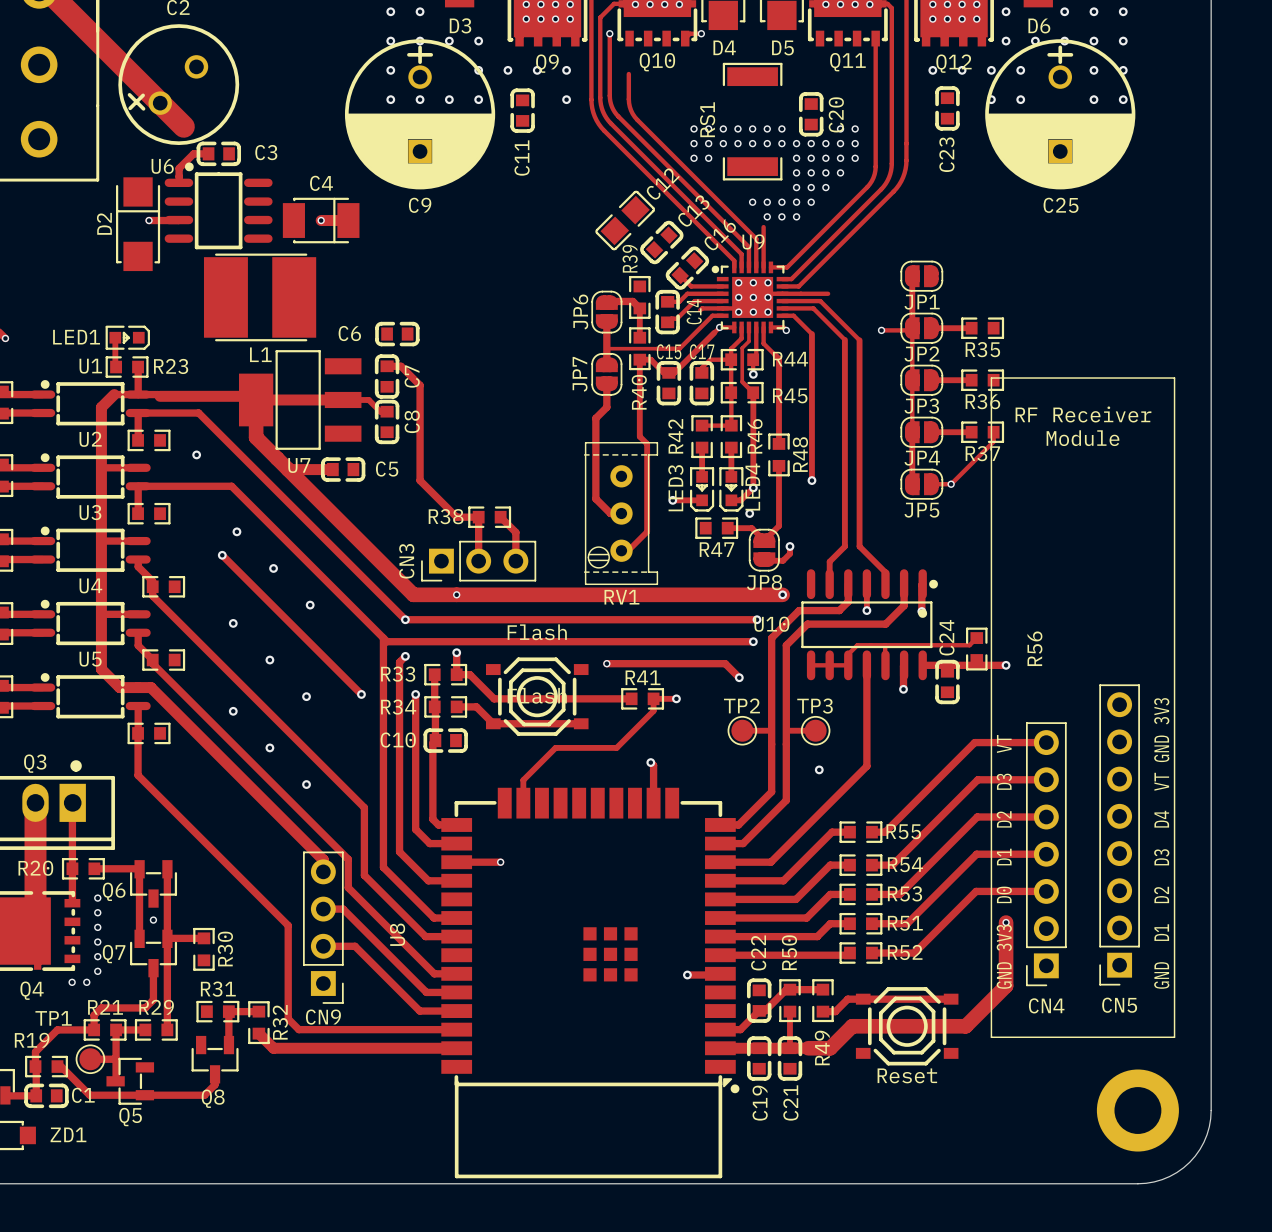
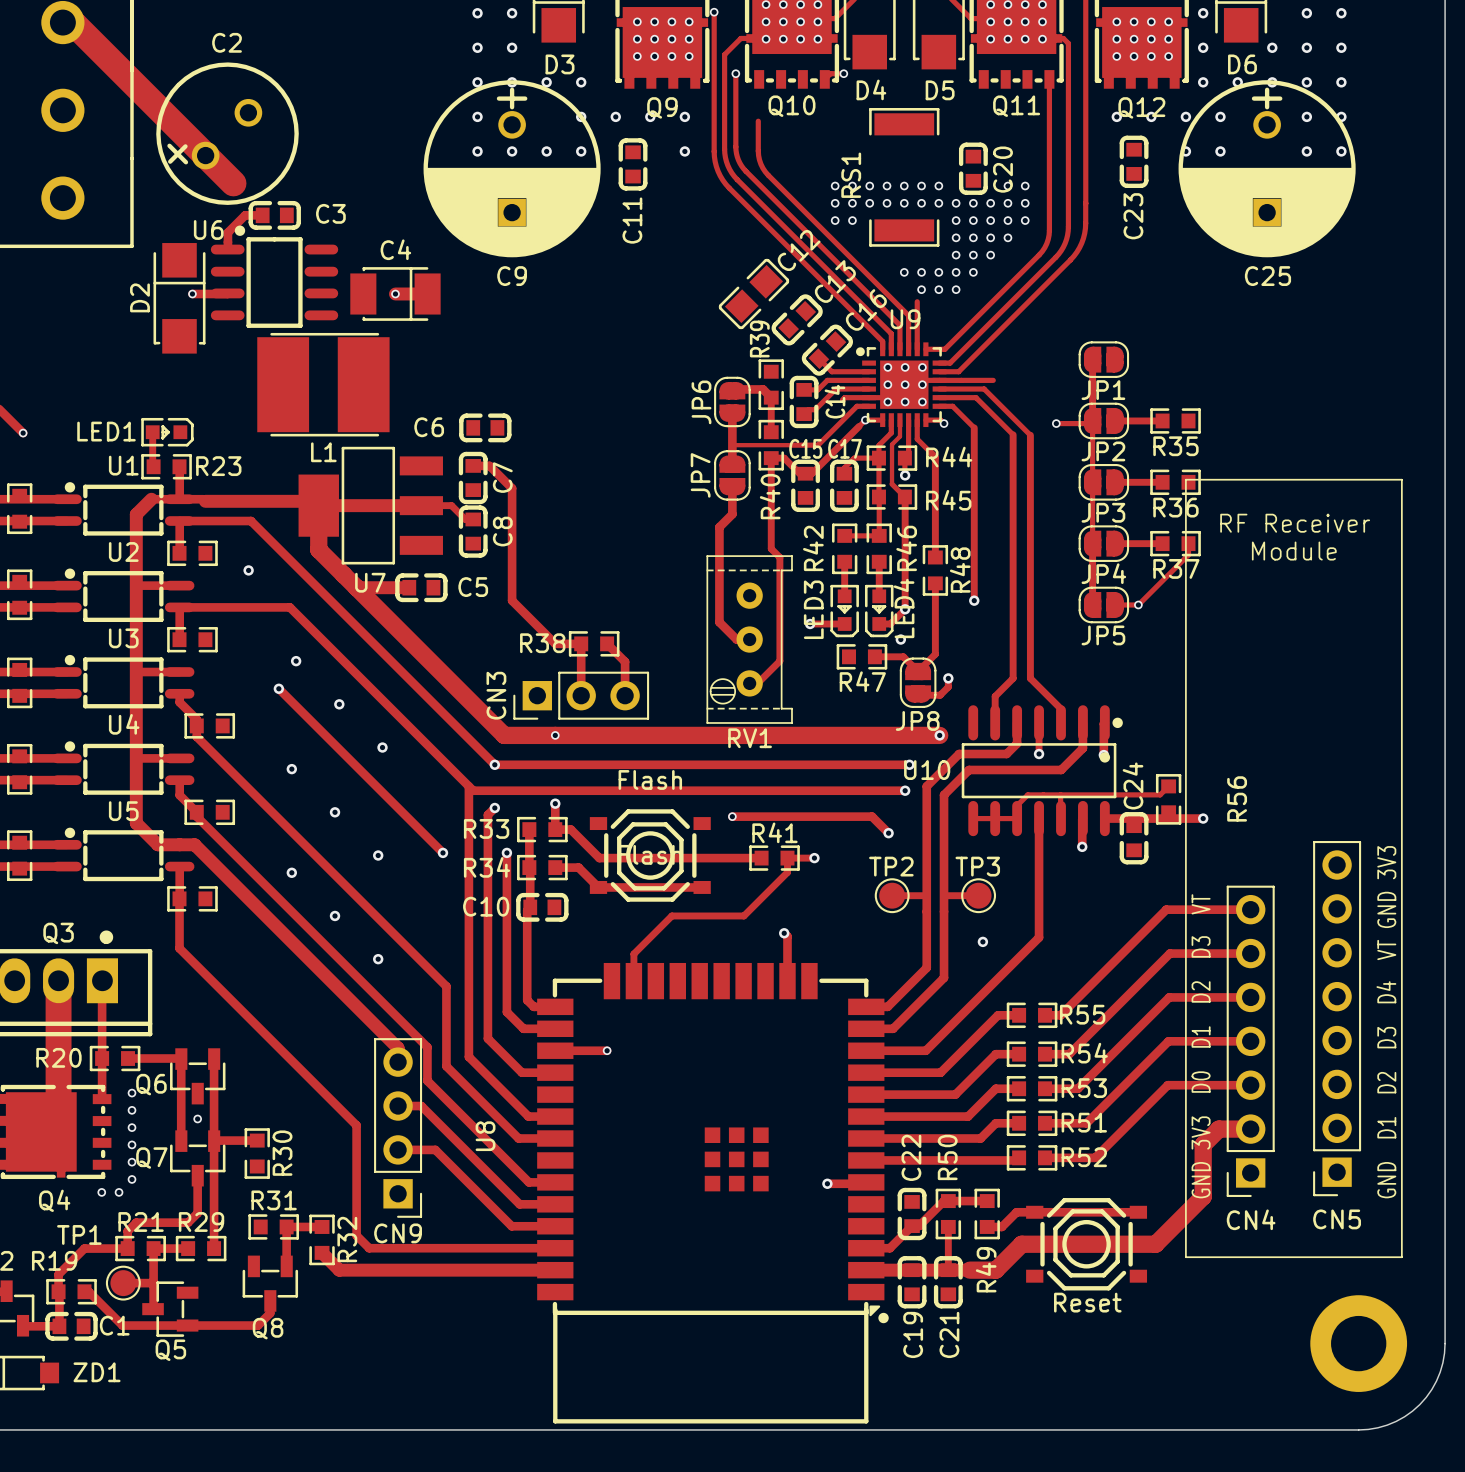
track: (1006, 922) (1006, 942) -> (1250, 1129) (1218, 1129) (1203, 1144)
via: (1006, 922) -> none

